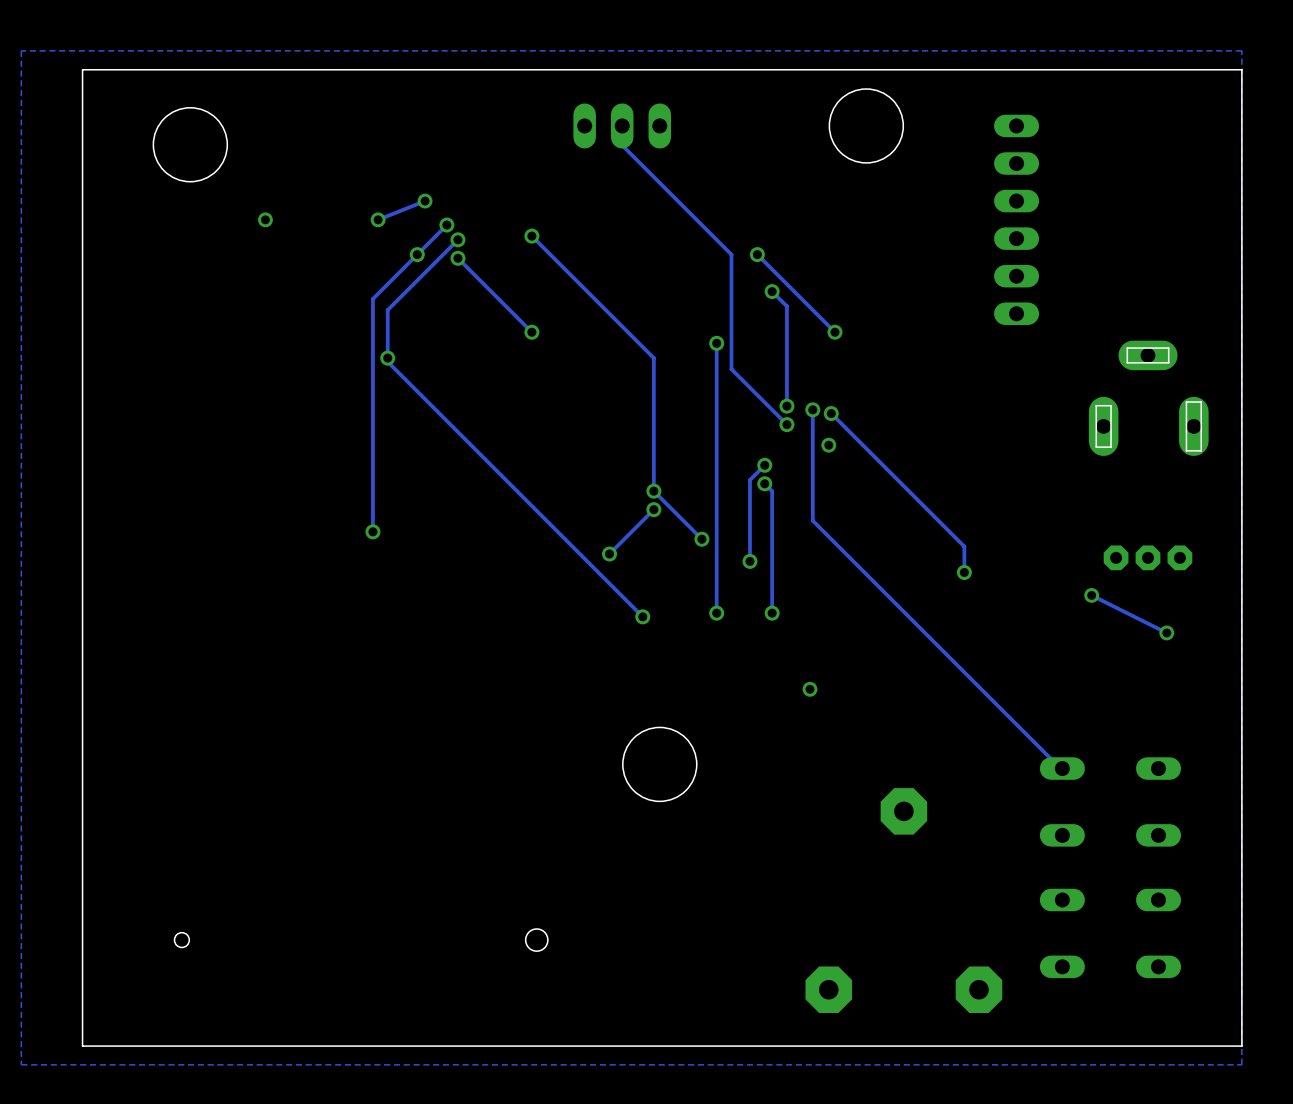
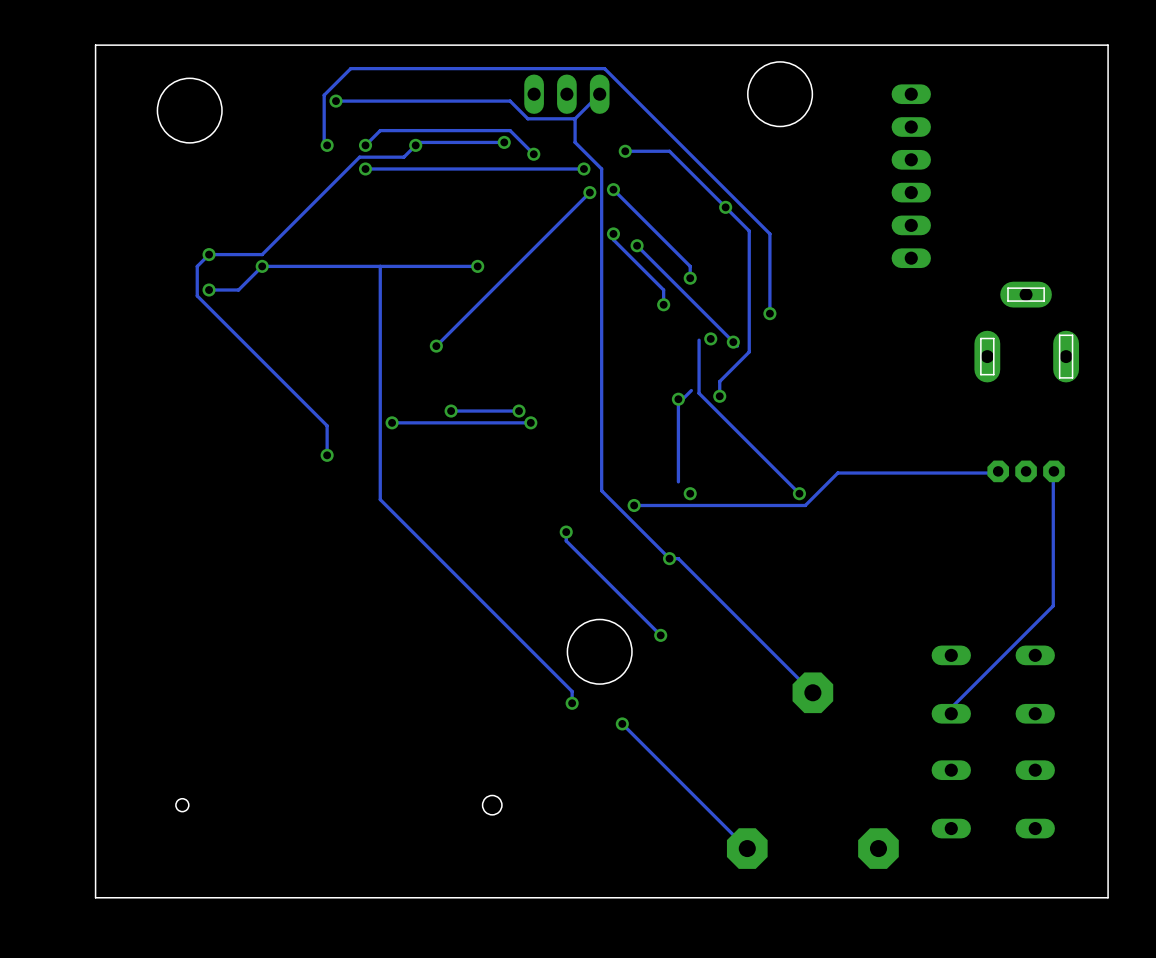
zone outline: (1241, 50) (21, 50) (21, 1064) (1241, 1064) (1241, 50) -> none
track: (622, 125) (624, 128) (624, 147) (731, 254) (731, 369) (786, 424) -> none
track: none -> (599, 94) (575, 118)
track: none -> (335, 101) (510, 101) (527, 118) (575, 118)
via: none -> (335, 101)
track: none -> (575, 118) (575, 142) (601, 168) (601, 490) (669, 558) (678, 558) (812, 692)
track: none -> (504, 142) (418, 142) (403, 157) (359, 157) (262, 254) (209, 254) (197, 266) (197, 295) (327, 425) (327, 455)
via: none -> (504, 142)
track: none -> (327, 145) (324, 142) (324, 95) (350, 68) (604, 68) (769, 233) (769, 313)
via: none -> (327, 145)
track: none -> (365, 145) (380, 130) (510, 130) (533, 154)
via: none -> (365, 145)
via: none -> (415, 145)
track: none -> (625, 151) (669, 151) (749, 230) (749, 352) (719, 381) (719, 396)
via: none -> (625, 151)
via: none -> (533, 154)
track: (425, 201) (378, 219) -> none
via: (425, 201) -> none
via: none -> (365, 168)
track: none -> (583, 168) (365, 168)
via: none -> (583, 168)
via: (265, 219) -> none
via: (378, 219) -> none
track: (446, 225) (372, 298) (372, 531) -> none
via: (446, 225) -> none
track: none -> (613, 189) (690, 266) (690, 278)
via: none -> (613, 189)
track: (531, 236) (653, 358) (653, 491) (701, 539) -> none
via: (531, 236) -> none
track: none -> (589, 192) (436, 346)
via: none -> (589, 192)
track: (457, 239) (387, 310) (387, 361) (642, 616) -> none
via: (457, 239) -> none
via: (417, 254) -> none
track: (757, 254) (834, 332) -> none
via: (757, 254) -> none
via: none -> (725, 207)
track: (457, 258) (531, 332) -> none
via: (457, 258) -> none
track: none -> (613, 233) (613, 239) (663, 290) (663, 304)
via: none -> (613, 233)
track: (772, 291) (786, 306) (786, 406) -> none
via: (772, 291) -> none
track: none -> (637, 245) (737, 346)
via: none -> (637, 245)
via: none -> (209, 254)
via: none -> (262, 266)
track: none -> (380, 266) (380, 499) (572, 691) (572, 703)
track: none -> (477, 266) (262, 266) (238, 290) (209, 290)
via position: (531, 332) -> (477, 266)
via: (834, 332) -> none
via: none -> (690, 278)
track: (716, 343) (716, 613) -> none
via: (716, 343) -> none
via: none -> (209, 290)
via: (387, 358) -> none
via: none -> (663, 304)
via: none -> (769, 313)
track: none -> (699, 340) (699, 393) (799, 493)
track: (812, 409) (812, 520) (1062, 768) -> none
track: (831, 413) (964, 546) (964, 572) -> none
via: (831, 413) -> none
via: none -> (436, 346)
via: (786, 424) -> none
via: (828, 445) -> none
via: (764, 465) -> none
via: none -> (719, 396)
via: none -> (678, 399)
track: (764, 483) (772, 491) (772, 613) -> none
via: (764, 483) -> none
via: none -> (451, 411)
track: none -> (519, 411) (451, 411)
via: none -> (519, 411)
via: (653, 491) -> none
via: none -> (392, 422)
track: none -> (530, 422) (392, 422)
via: none -> (530, 422)
track: (653, 509) (609, 554) -> none
via: (653, 509) -> none
via position: (372, 531) -> (327, 455)
via: (701, 539) -> none
via: (609, 554) -> none
track: none -> (998, 471) (997, 473) (837, 473) (805, 505) (634, 505)
track: none -> (1053, 471) (1053, 605) (952, 706) (951, 713)
via: (749, 561) -> none
via: (964, 572) -> none
via: none -> (690, 493)
via: none -> (799, 493)
track: (1091, 595) (1166, 632) -> none
via: (1091, 595) -> none
via position: (716, 613) -> (634, 505)
via: (772, 613) -> none
via position: (642, 616) -> (566, 532)
track: none -> (566, 532) (566, 540) (660, 635)
via: (1166, 632) -> none
via: none -> (669, 558)
via: (810, 689) -> none
via: none -> (660, 635)
via: none -> (572, 703)
track: none -> (622, 723) (747, 848)
via: none -> (622, 723)

